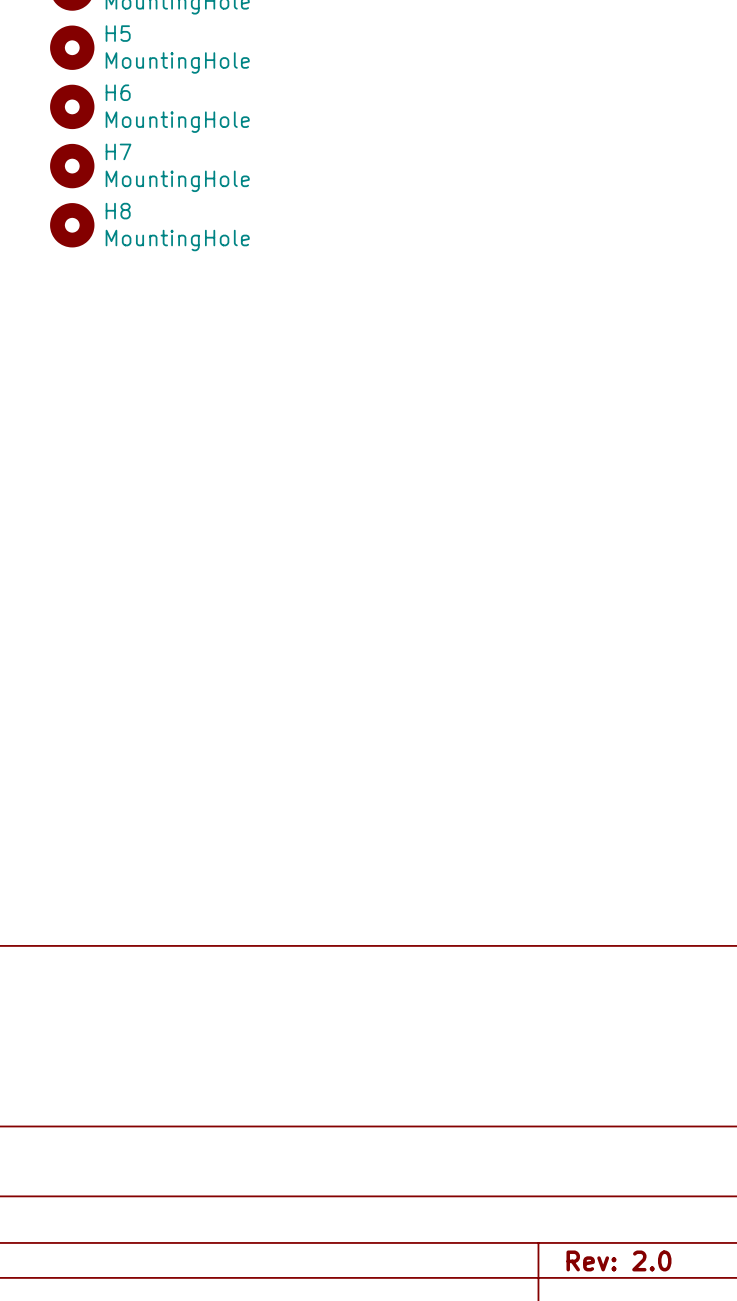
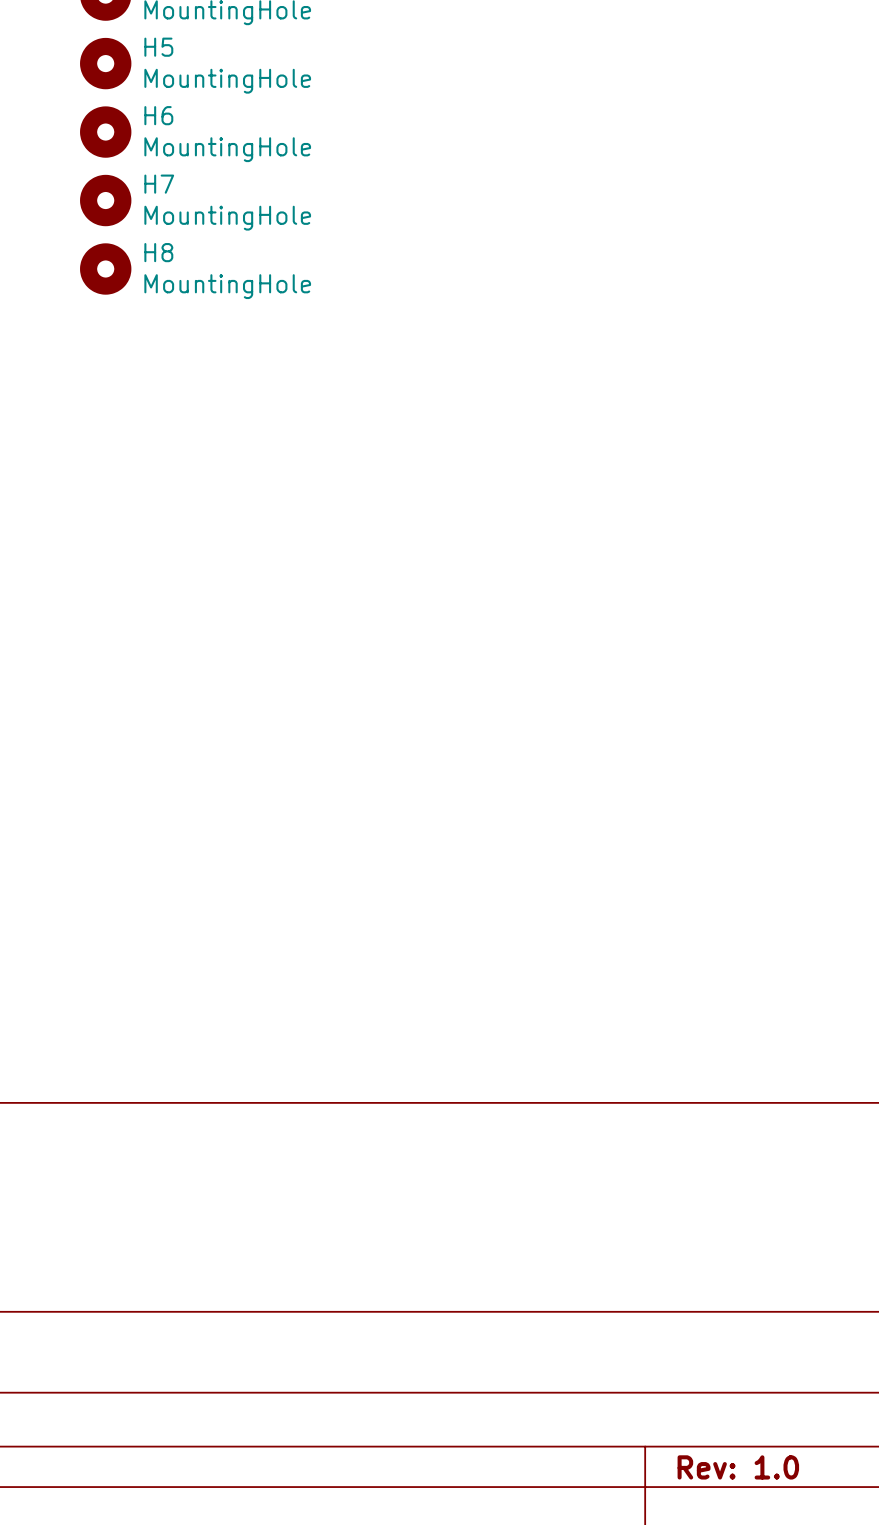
title block: Rev: 2.0 (618, 1260) -> Rev: 1.0 (738, 1467)

